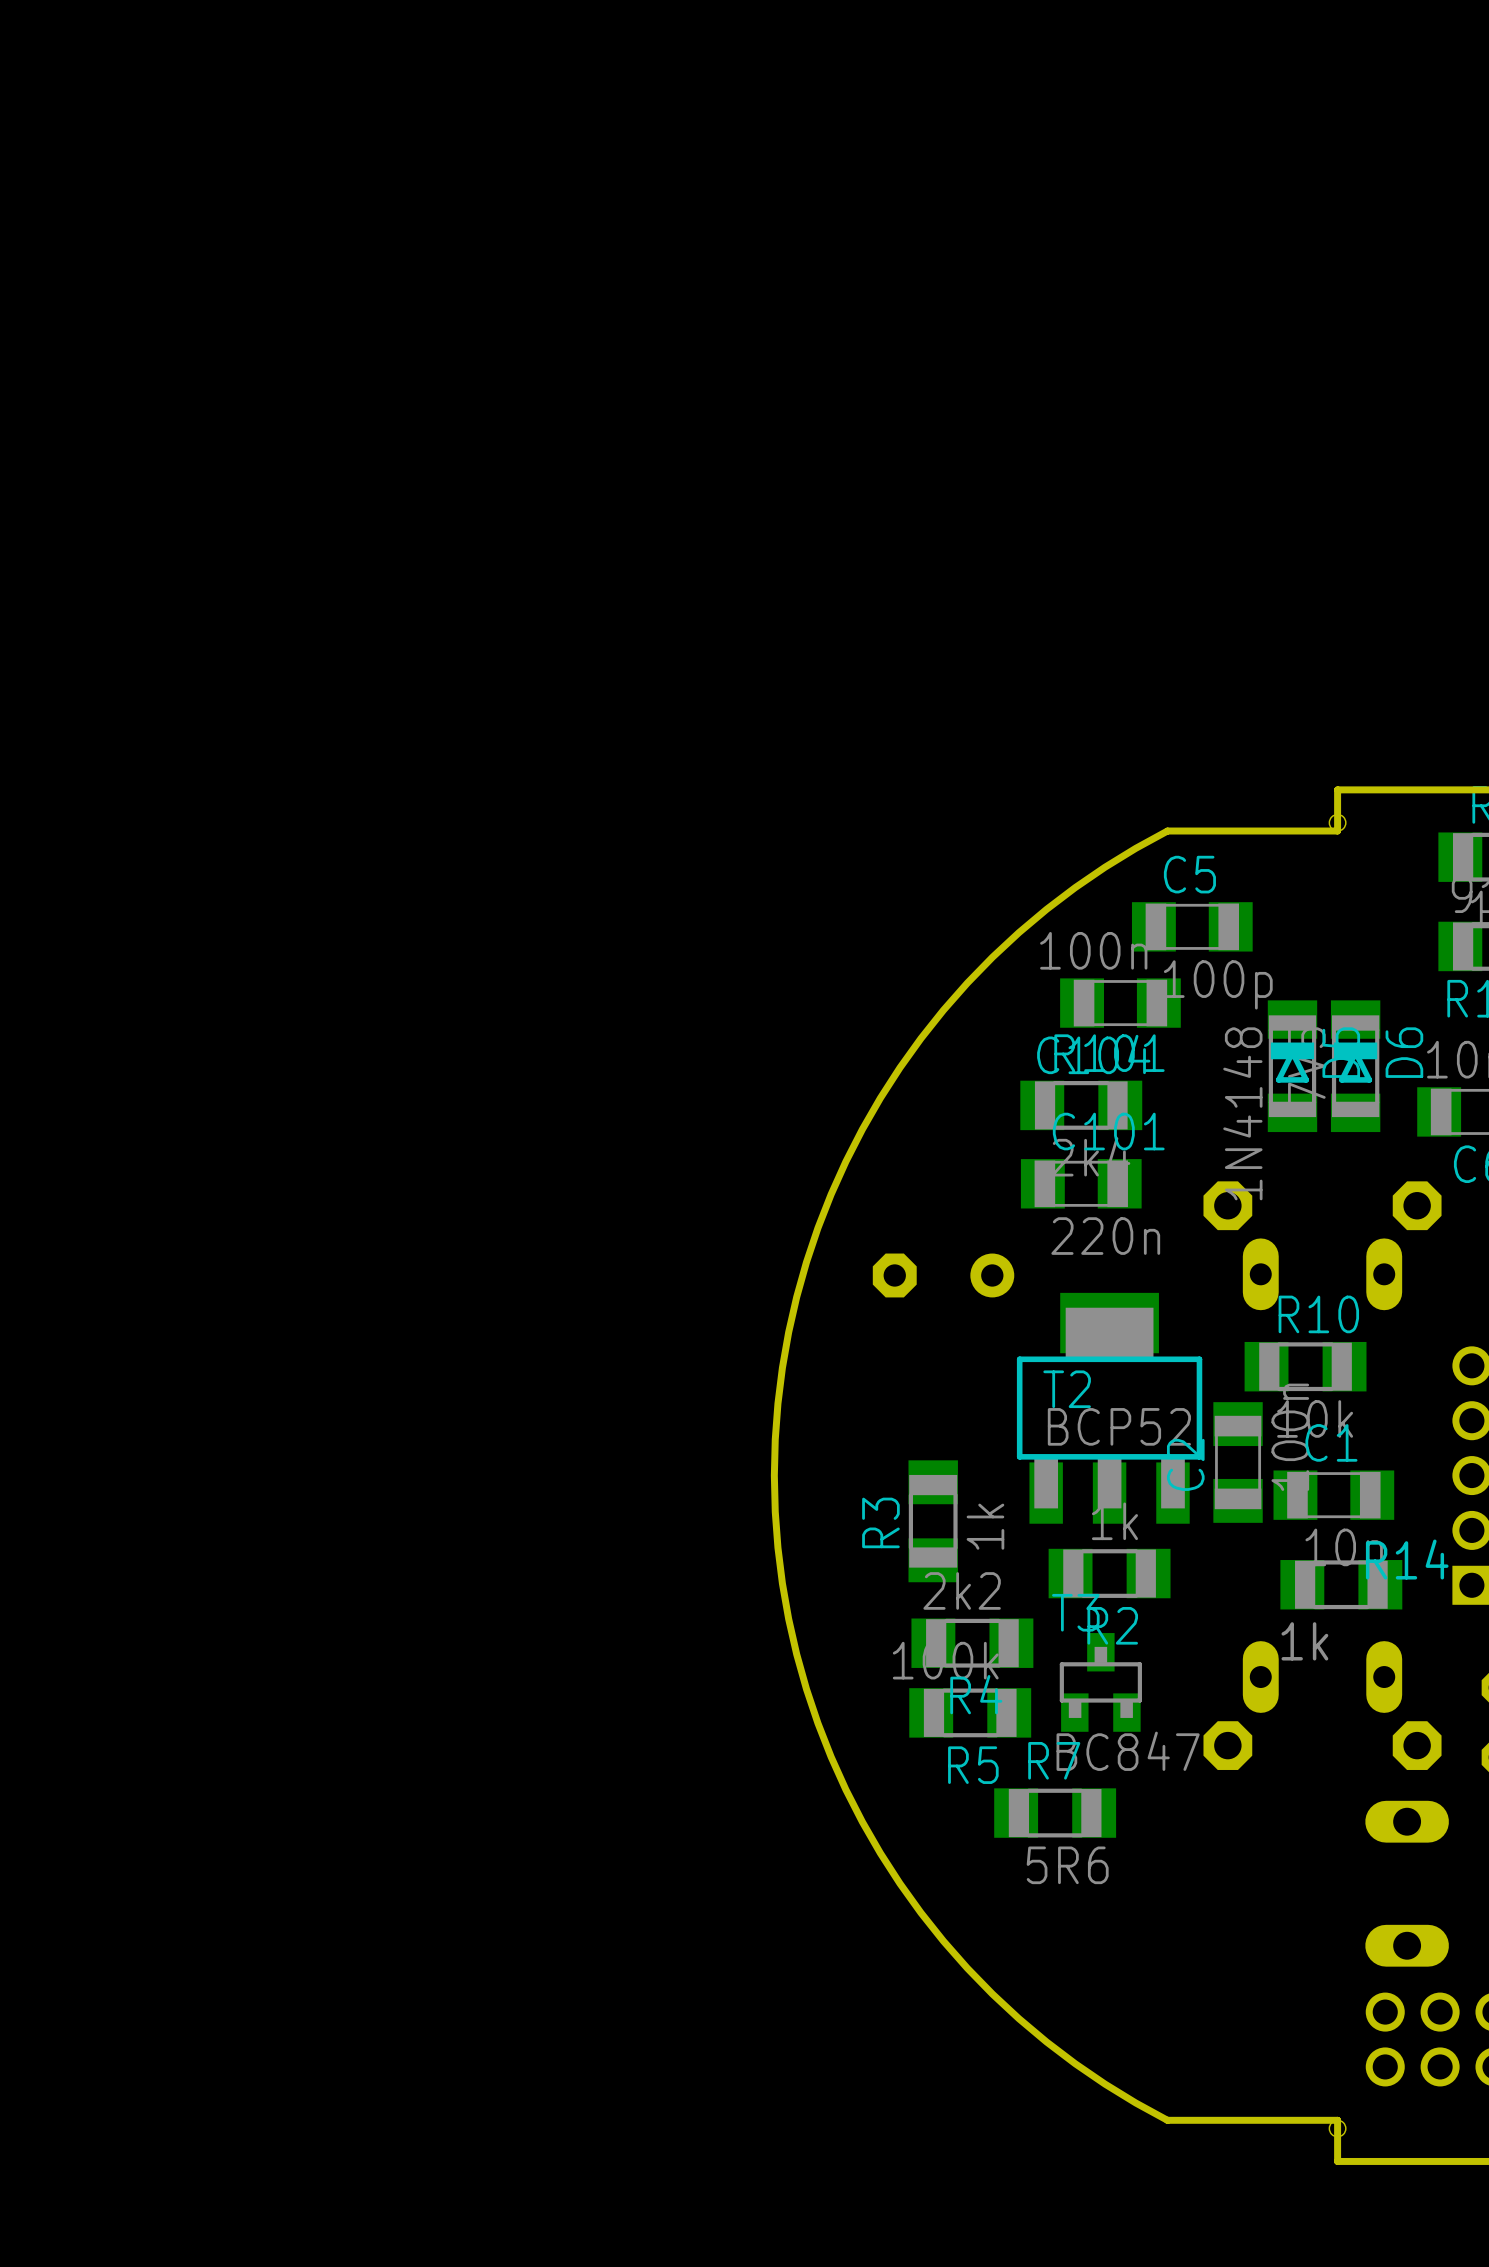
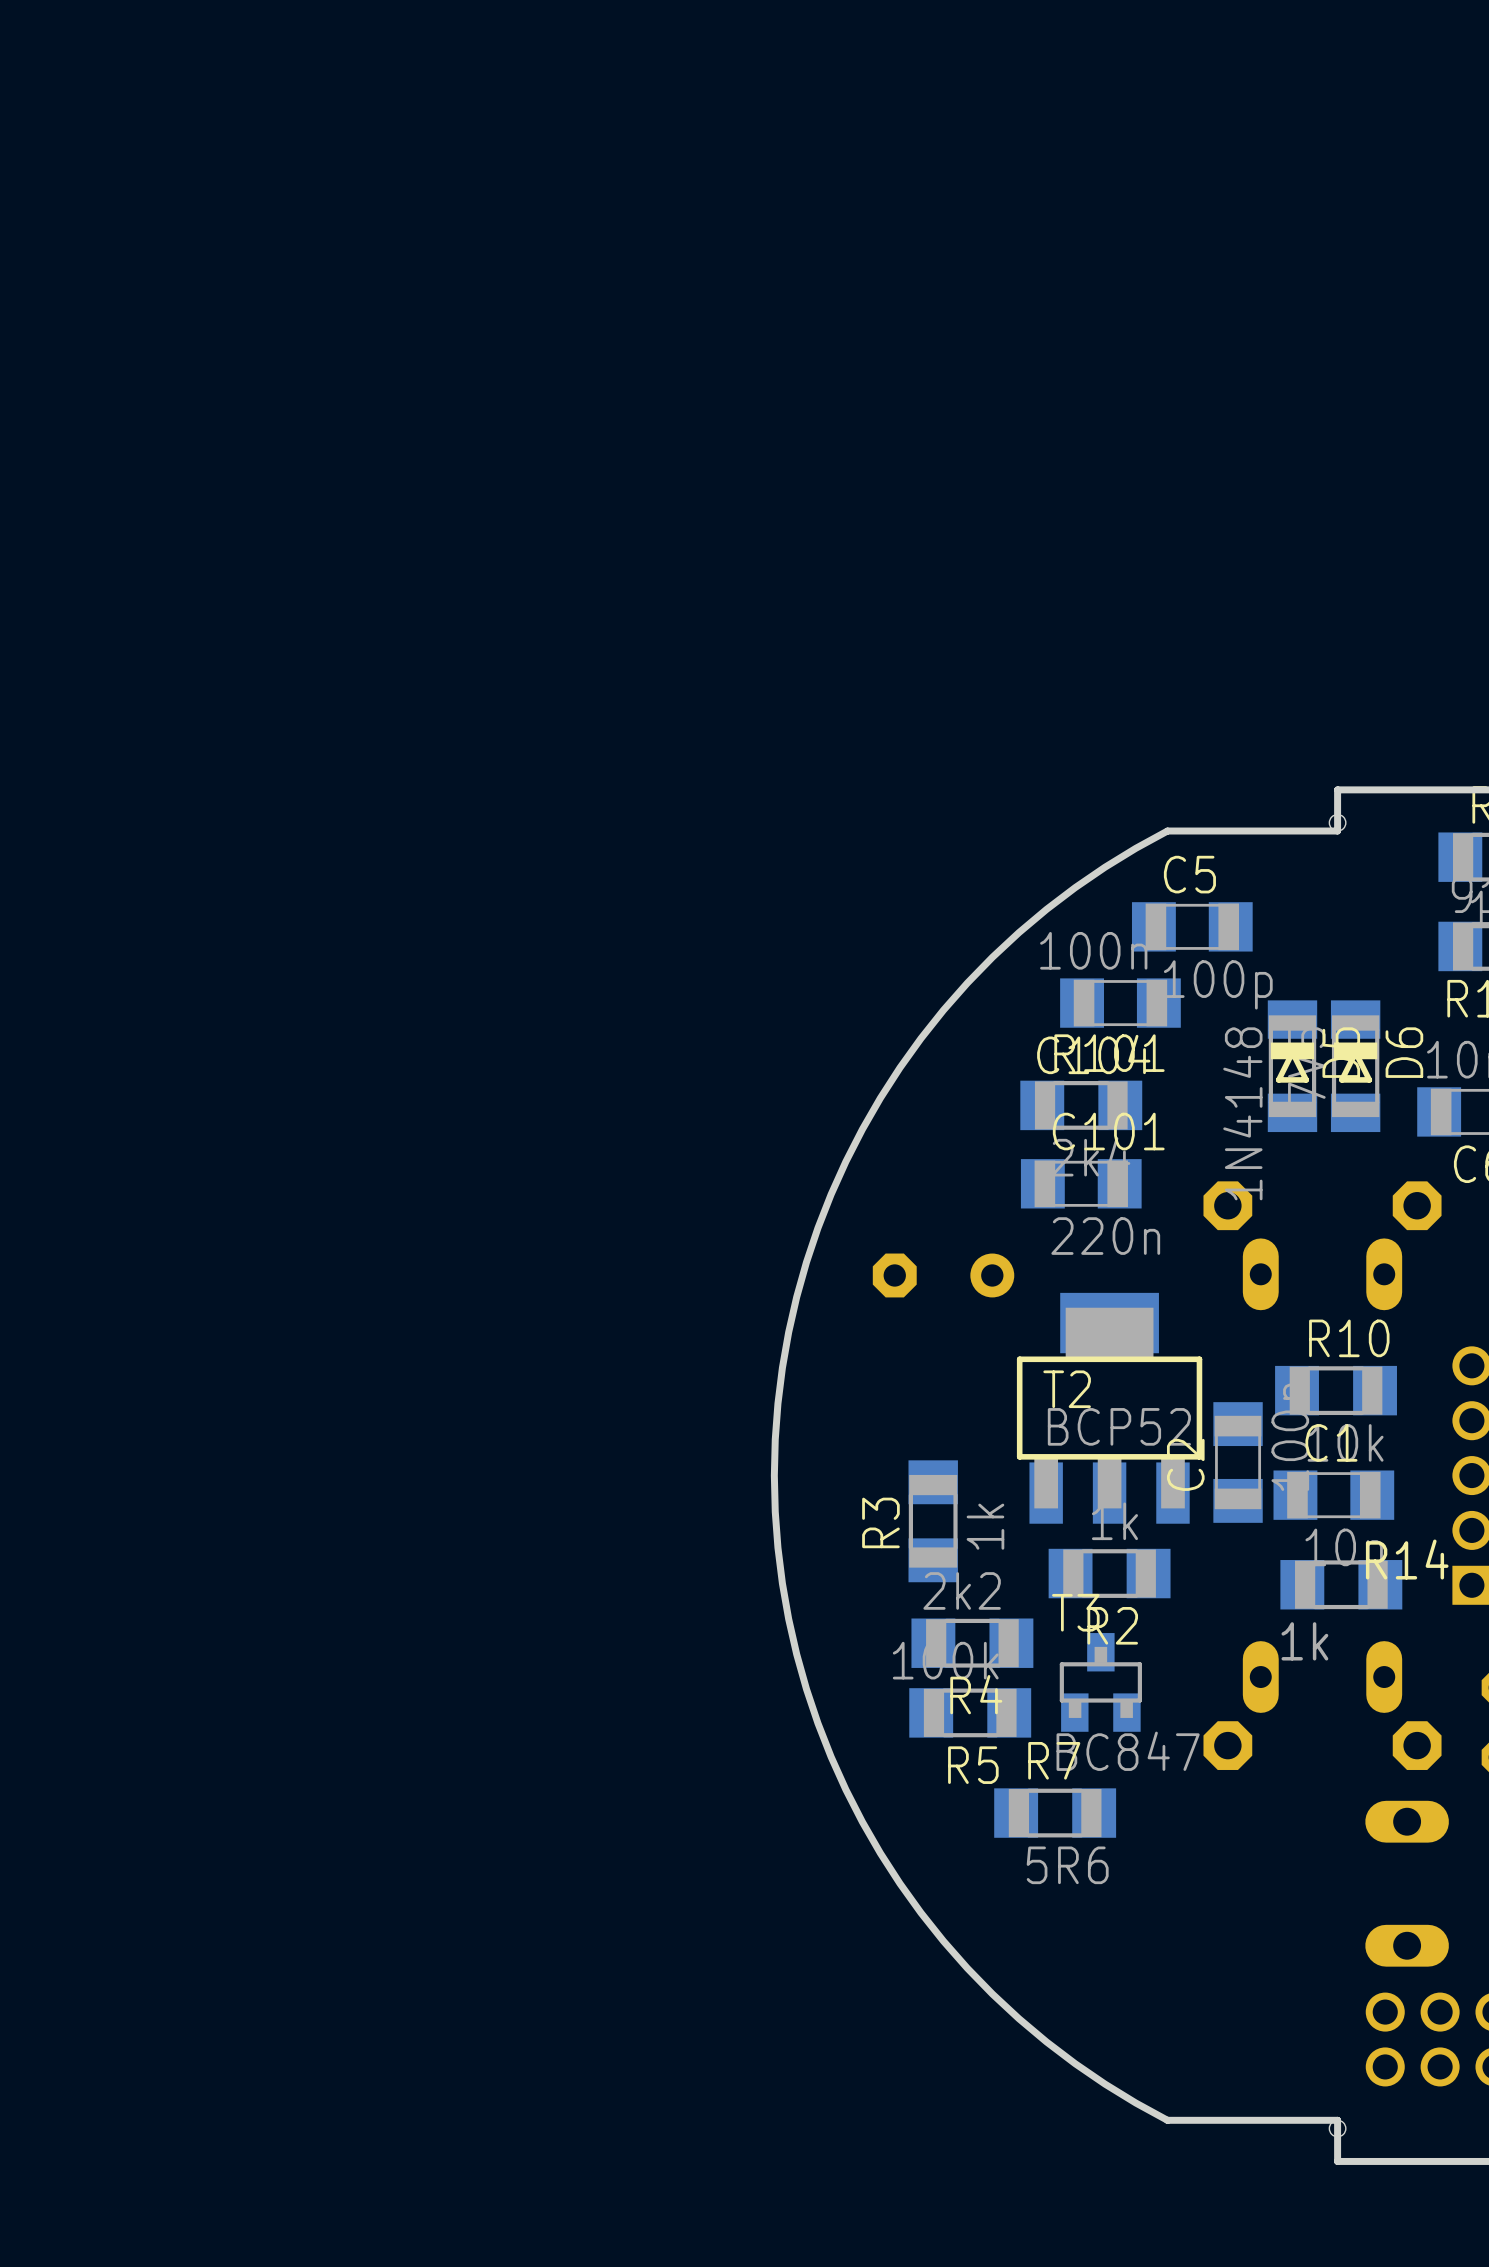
R10 position: (1305, 1366) -> (1336, 1390)

